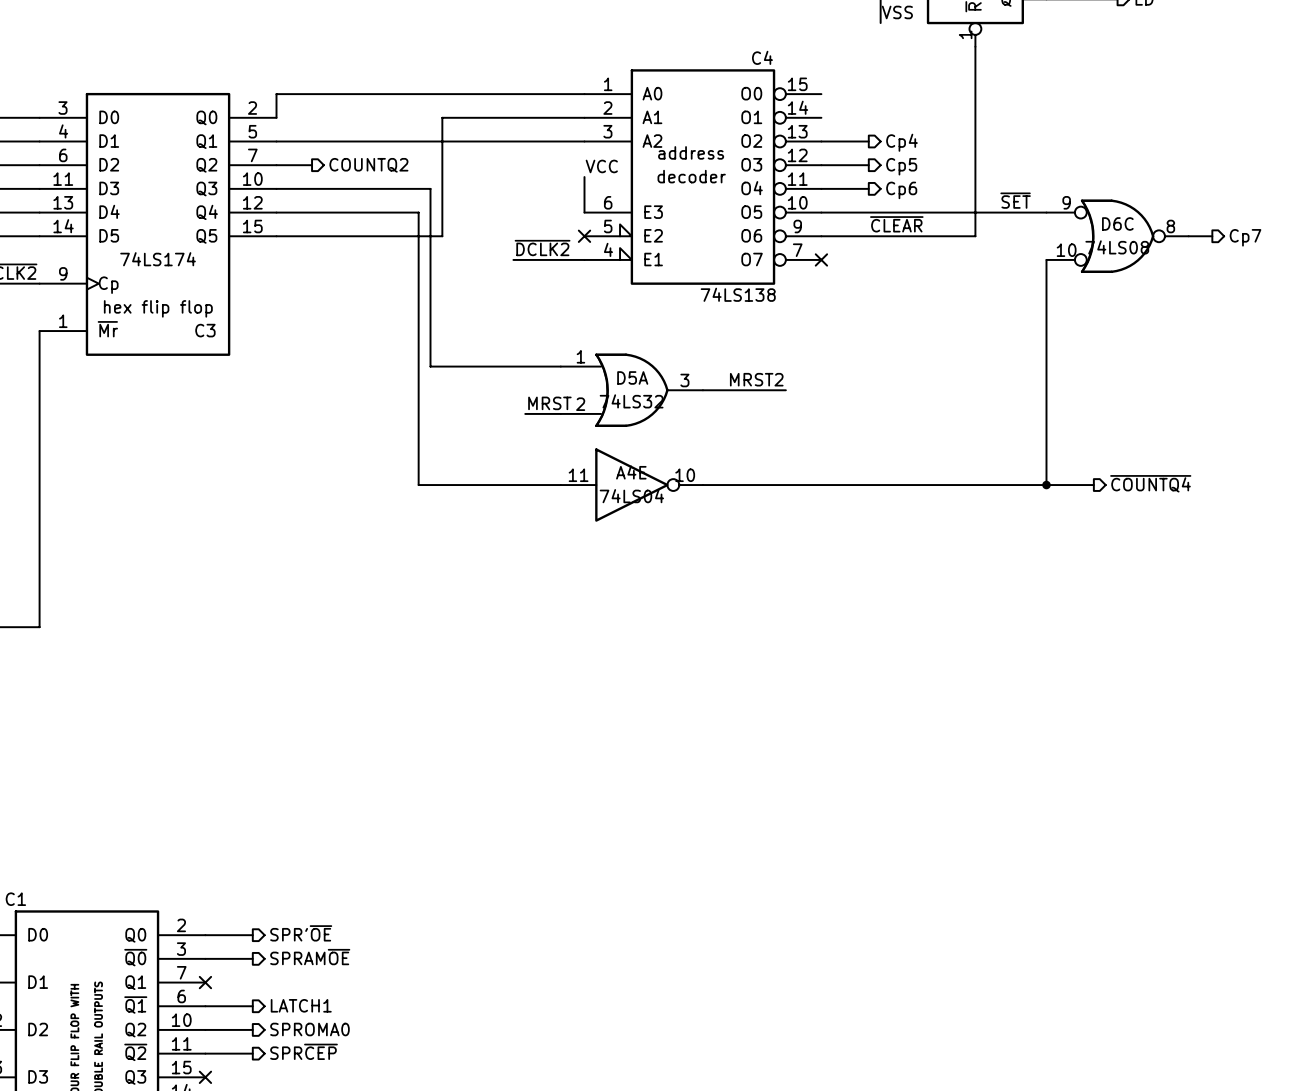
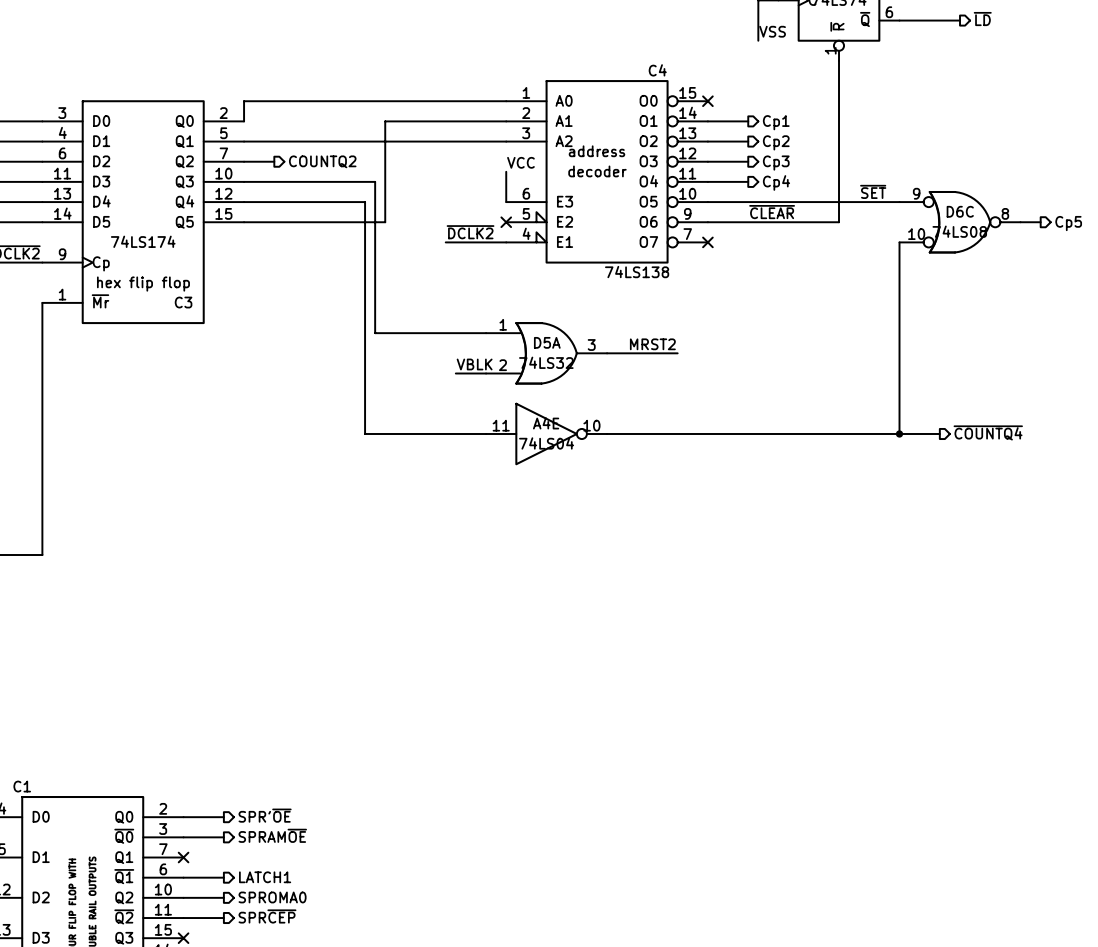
no-connect mark: none -> (707, 101)
wire: none -> (707, 121) (748, 121)
hierarchical label: none -> Cp1 (776, 122)
hierarchical label: Cp4 (901, 142) -> Cp2 (776, 142)
hierarchical label: Cp5 (901, 166) -> Cp3 (776, 163)
hierarchical label: Cp6 (901, 190) -> Cp4 (776, 182)
hierarchical label: Cp7 (1245, 237) -> Cp5 (1068, 223)
label: MRST (549, 403) -> VBLK (474, 364)

